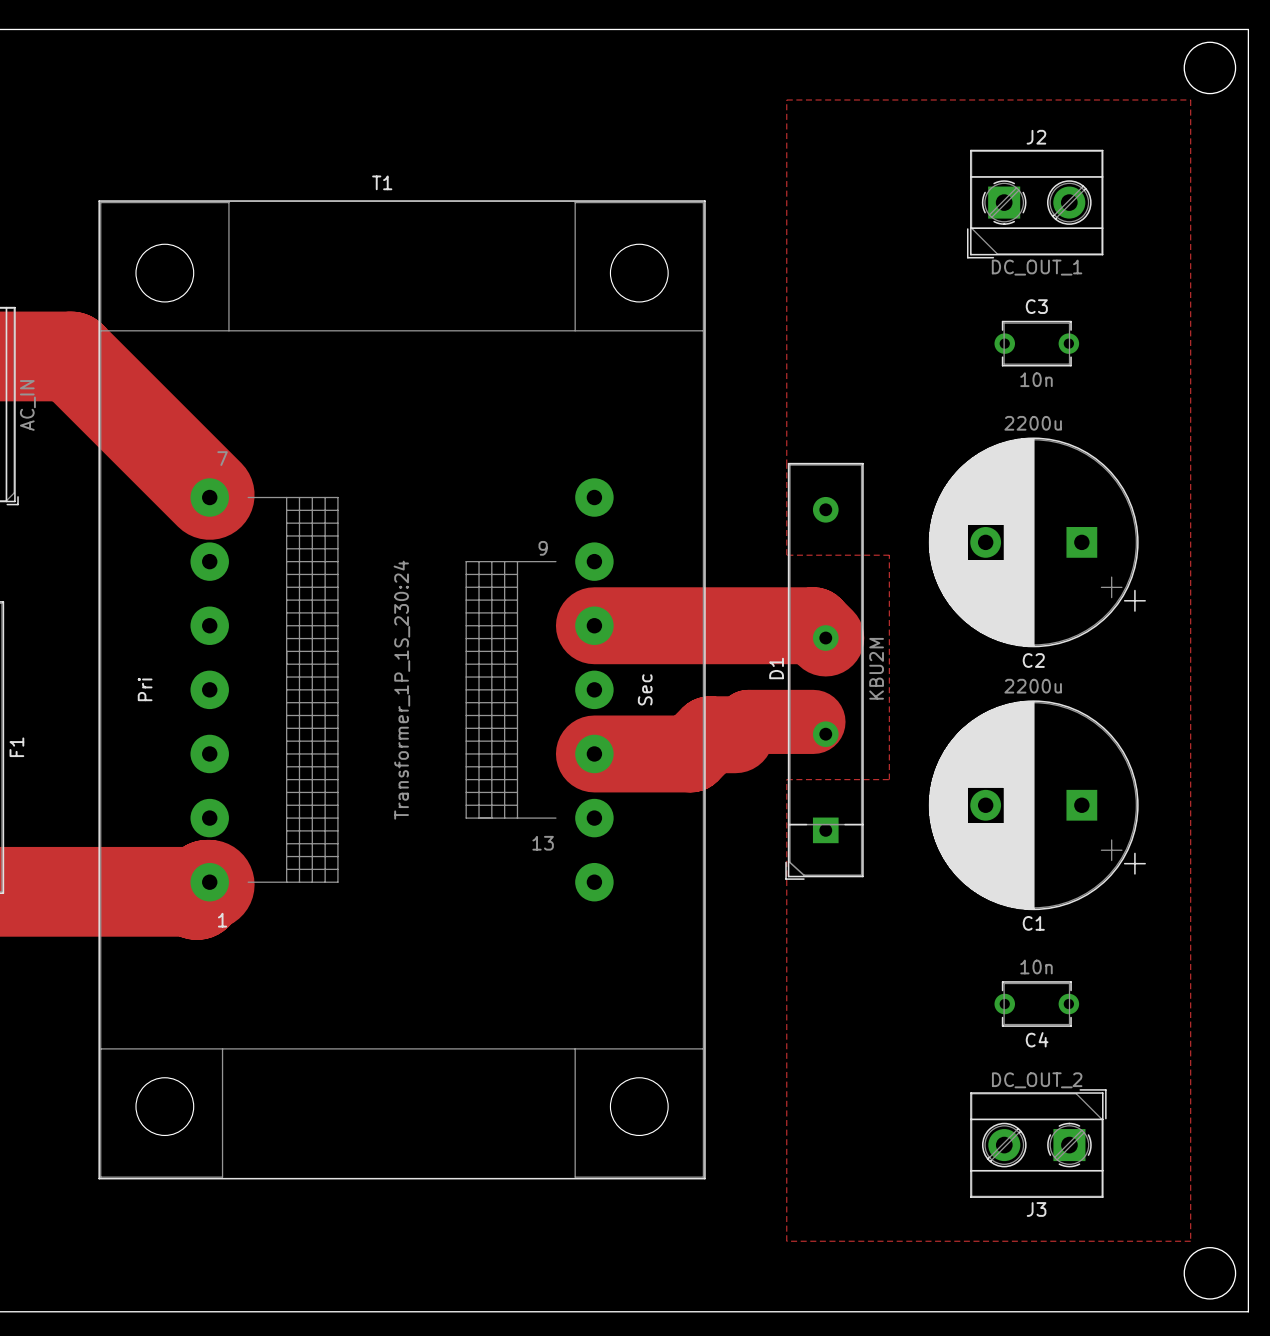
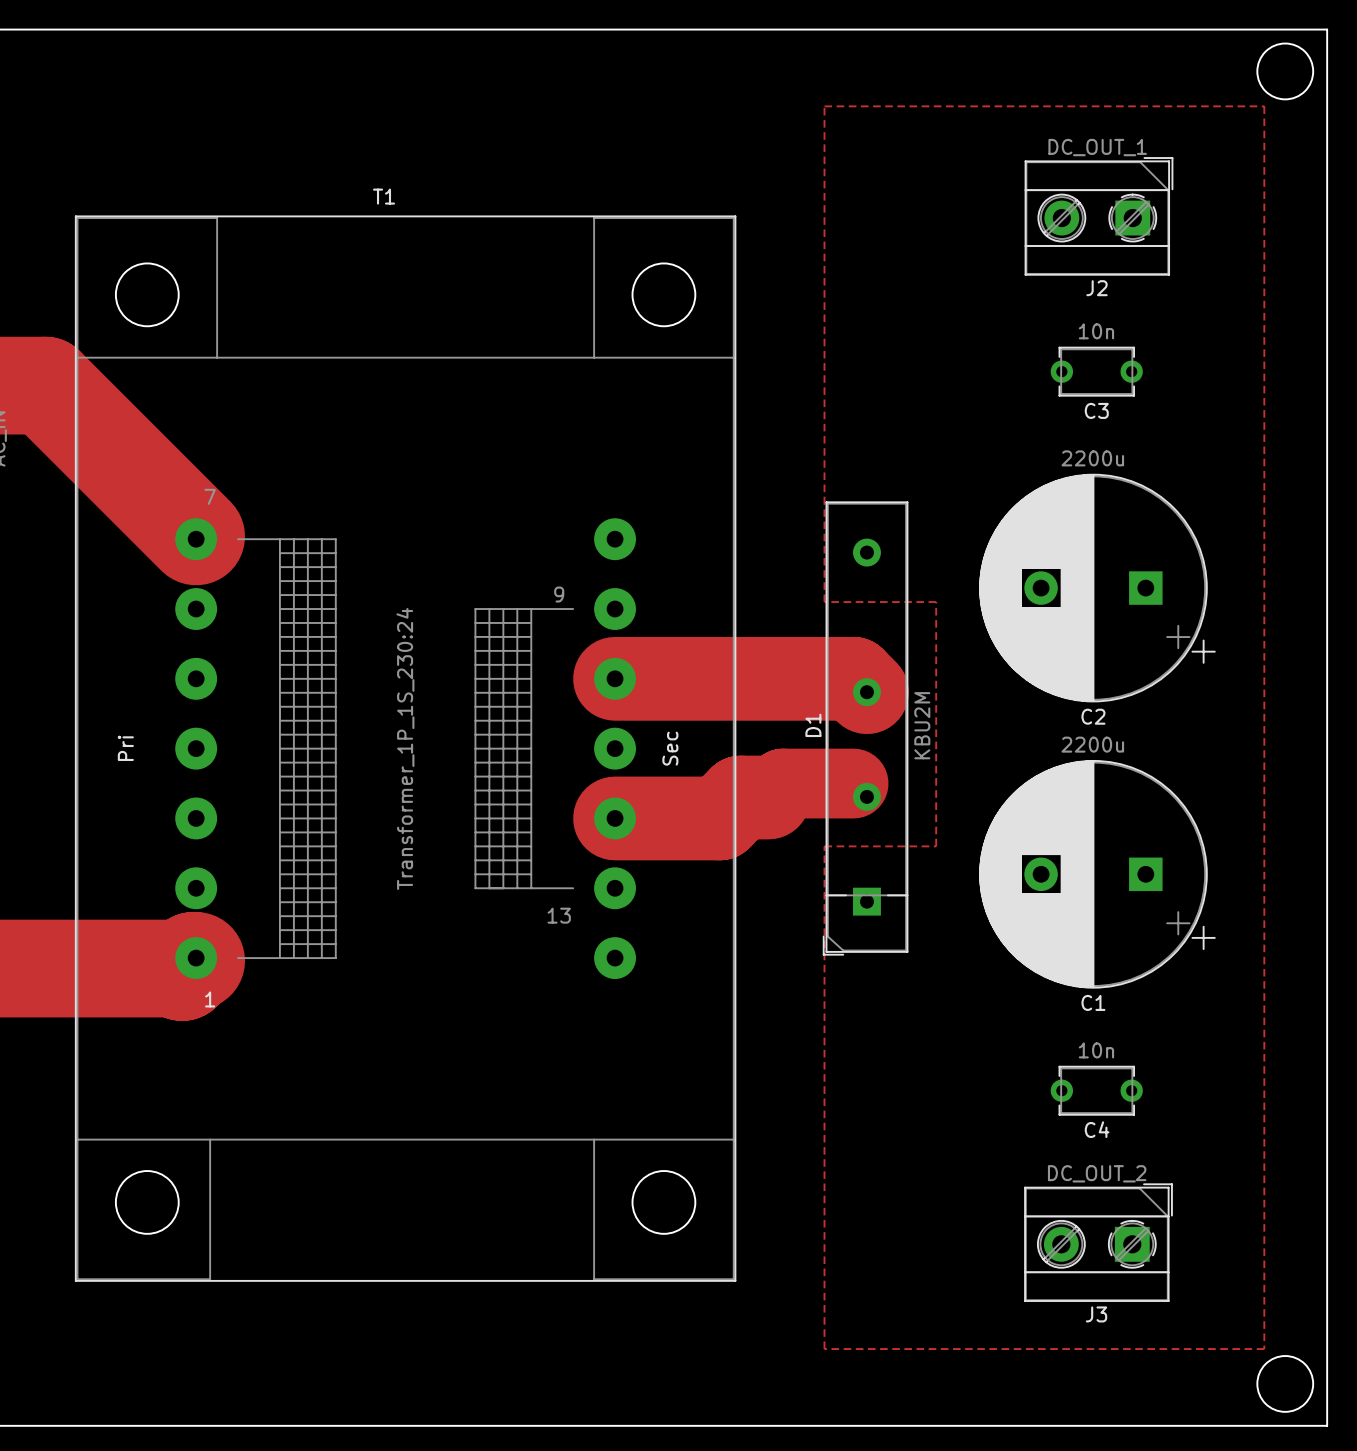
J2 rotation: 0° (1035, 204) -> 180° (1099, 216)
C3 name position: C3 (1036, 306) -> C3 (1096, 410)
C3 value position: 10n (1036, 379) -> 10n (1096, 331)

